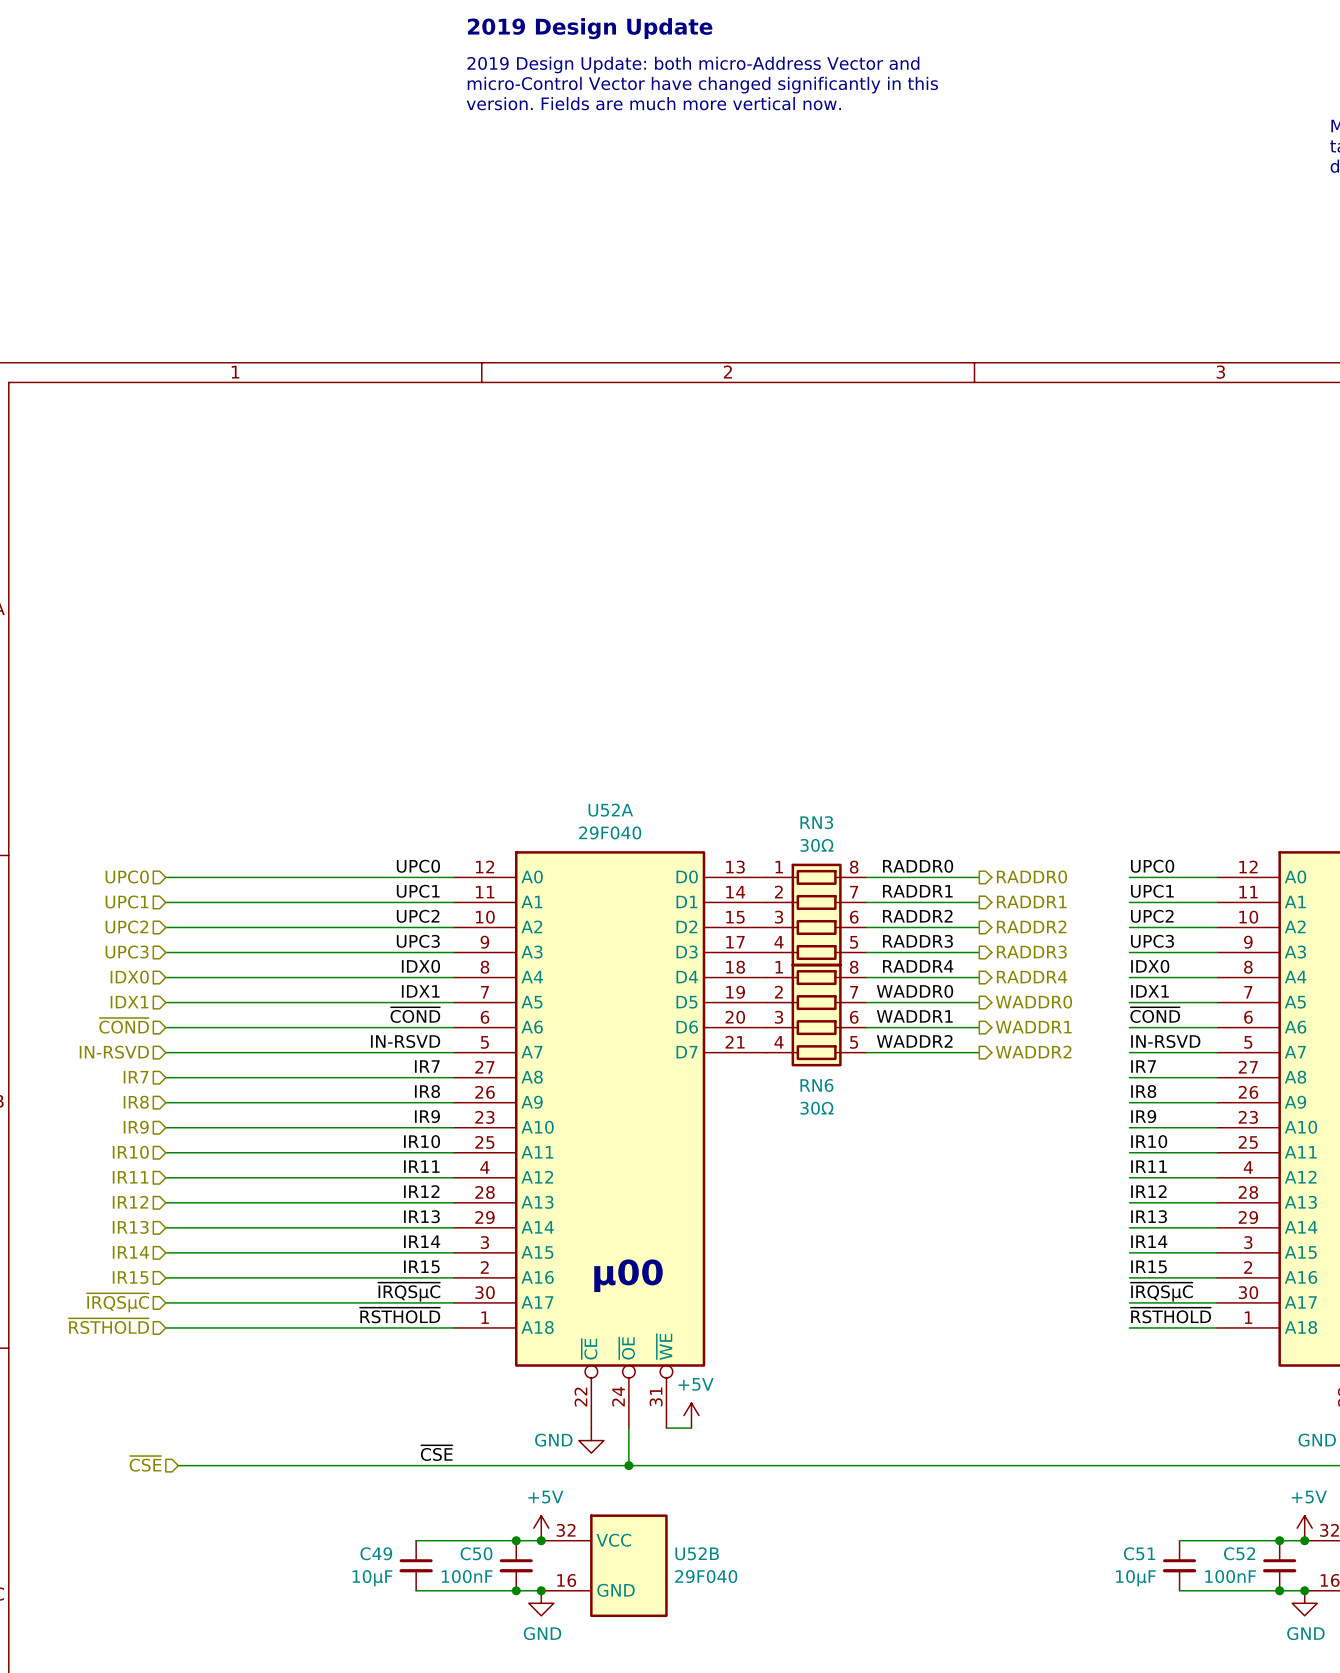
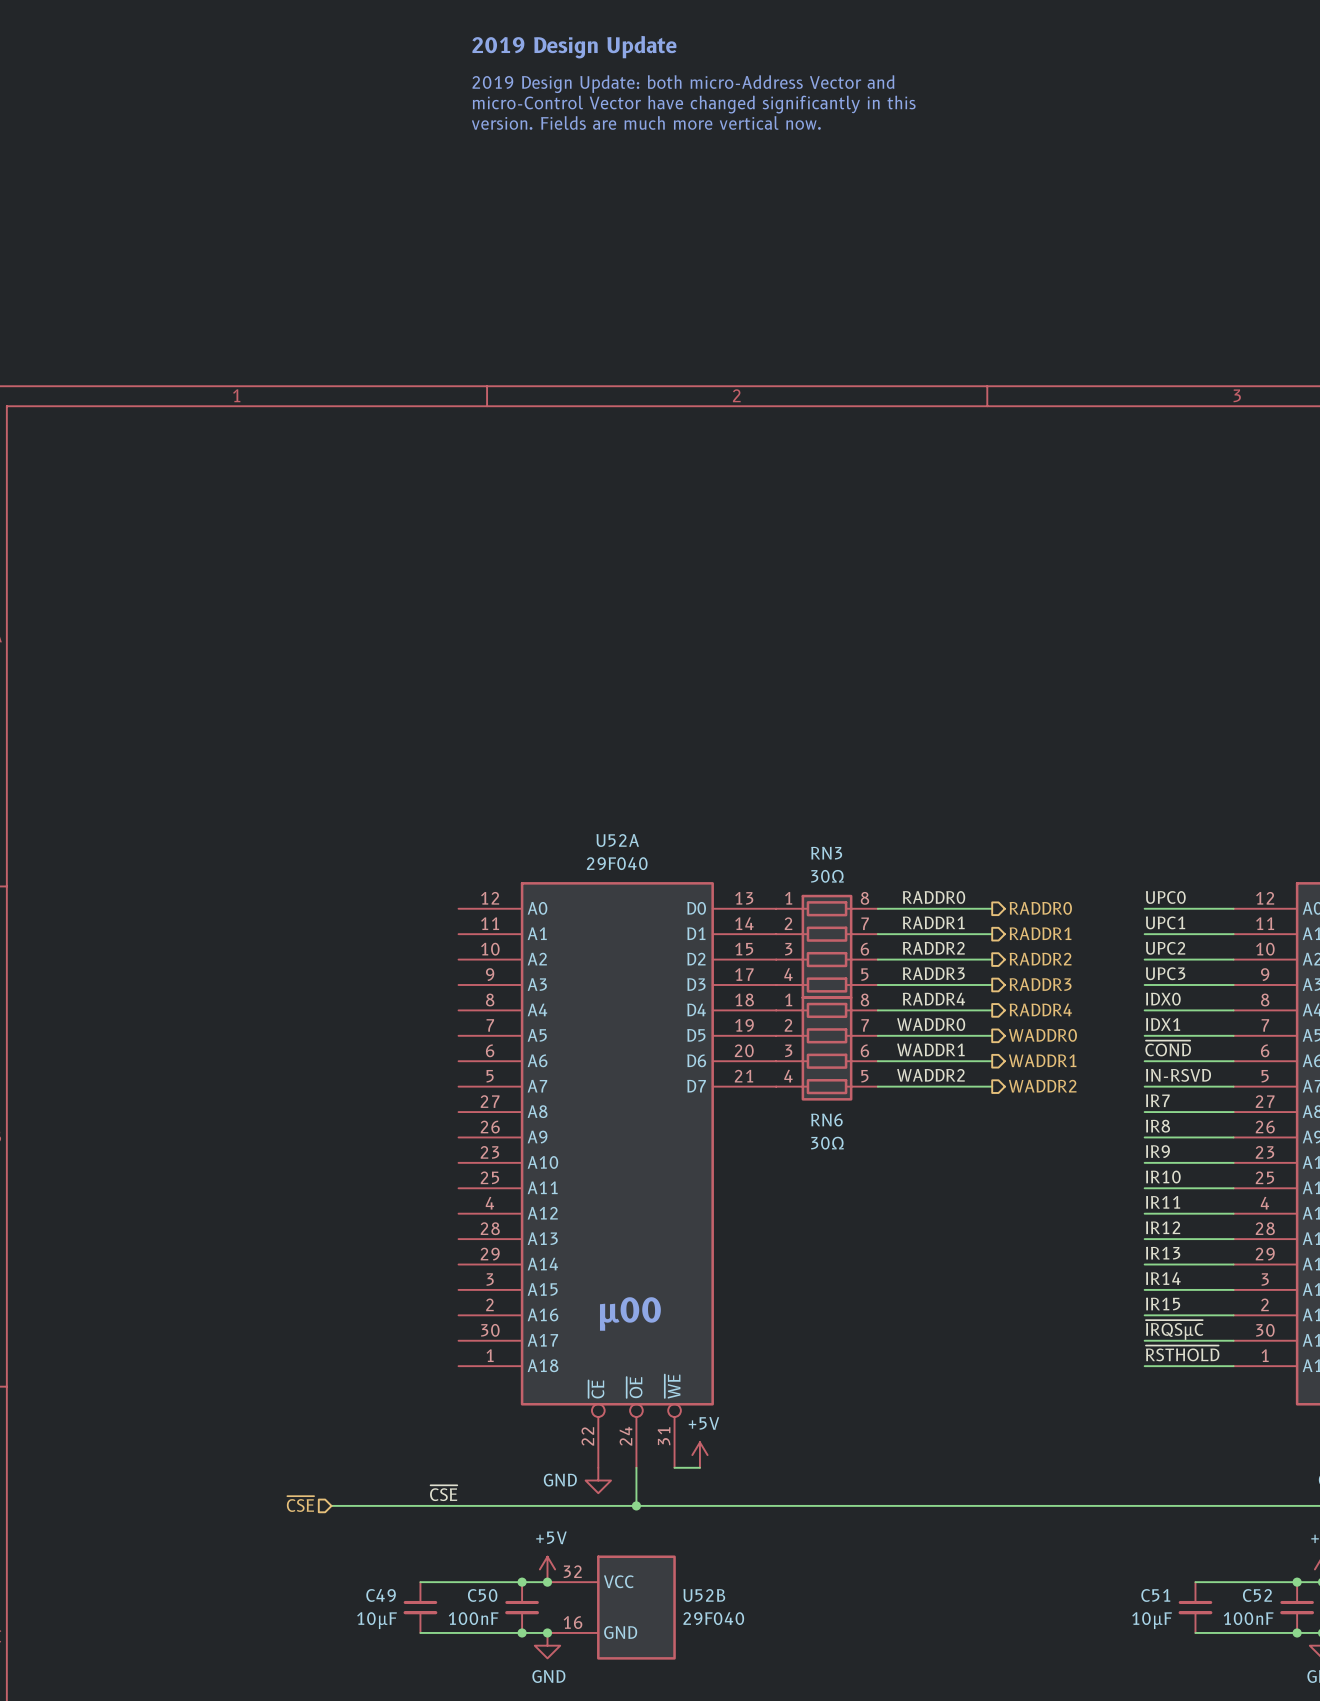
label: UPC0 (418, 866) -> none
hierarchical label: UPC0 (127, 876) -> none
wire: (165, 877) (453, 877) -> none
label: UPC1 (418, 891) -> none
hierarchical label: UPC1 (126, 902) -> none
wire: (165, 902) (453, 902) -> none
label: UPC2 (418, 916) -> none
hierarchical label: UPC2 (126, 927) -> none
wire: (165, 927) (453, 927) -> none
label: UPC3 (418, 941) -> none
hierarchical label: UPC3 (127, 952) -> none
wire: (165, 952) (453, 952) -> none
label: IDX0 (420, 966) -> none
hierarchical label: IDX0 (129, 977) -> none
wire: (165, 977) (453, 977) -> none
label: IDX1 (420, 991) -> none
hierarchical label: IDX1 (129, 1002) -> none
wire: (165, 1002) (453, 1002) -> none
label: ~{COND} (415, 1015) -> none
hierarchical label: ~{COND} (124, 1025) -> none
wire: (165, 1027) (453, 1027) -> none
label: IN-RSVD (405, 1041) -> none
hierarchical label: IN-RSVD (114, 1052) -> none
wire: (165, 1052) (453, 1052) -> none
label: IR7 (427, 1066) -> none
hierarchical label: IR7 (136, 1077) -> none
wire: (165, 1077) (453, 1077) -> none
label: IR8 (427, 1091) -> none
hierarchical label: IR8 (136, 1102) -> none
wire: (165, 1102) (453, 1102) -> none
label: IR9 (427, 1116) -> none
hierarchical label: IR9 (136, 1127) -> none
wire: (165, 1127) (453, 1127) -> none
label: IR10 (422, 1141) -> none
hierarchical label: IR10 (130, 1152) -> none
wire: (165, 1152) (453, 1152) -> none
label: IR11 (421, 1166) -> none
hierarchical label: IR11 (130, 1177) -> none
wire: (165, 1177) (453, 1177) -> none
label: IR12 (421, 1191) -> none
hierarchical label: IR12 (130, 1202) -> none
wire: (165, 1202) (453, 1202) -> none
label: IR13 (421, 1216) -> none
hierarchical label: IR13 (130, 1227) -> none
wire: (165, 1227) (453, 1227) -> none
label: IR14 (422, 1241) -> none
hierarchical label: IR14 (130, 1252) -> none
wire: (165, 1252) (453, 1252) -> none
label: IR15 (421, 1266) -> none
hierarchical label: IR15 (130, 1277) -> none
wire: (165, 1277) (453, 1277) -> none
label: ~{IRQSµC} (409, 1292) -> none
hierarchical label: ~{IRQSµC} (117, 1302) -> none
wire: (165, 1302) (453, 1302) -> none
label: ~{RSTHOLD} (400, 1315) -> none
hierarchical label: ~{RSTHOLD} (108, 1326) -> none
wire: (165, 1327) (453, 1327) -> none
hierarchical label position: ~{CSE} (145, 1463) -> ~{CSE} (300, 1504)
wire: (178, 1465) (328, 1465) -> none

